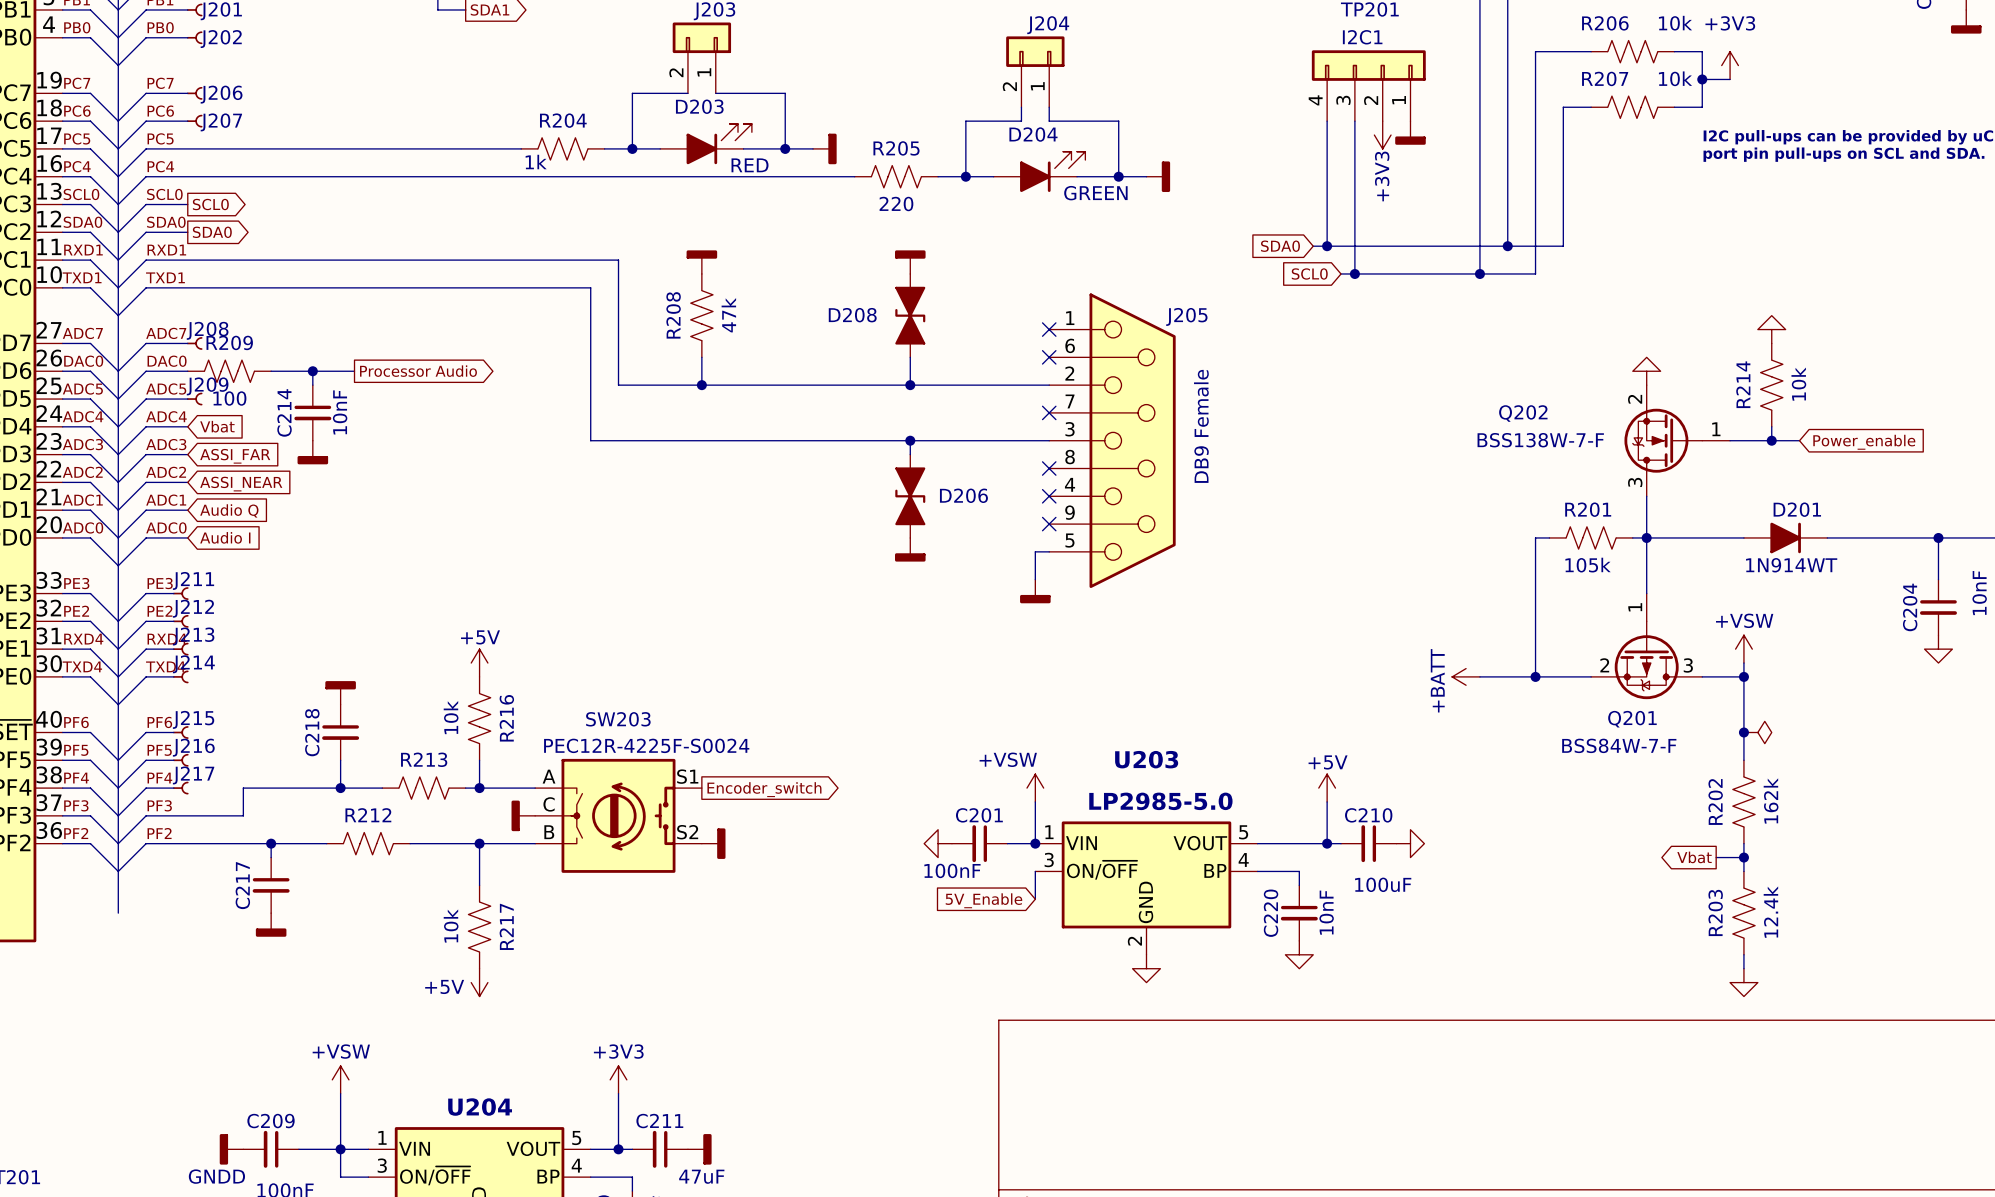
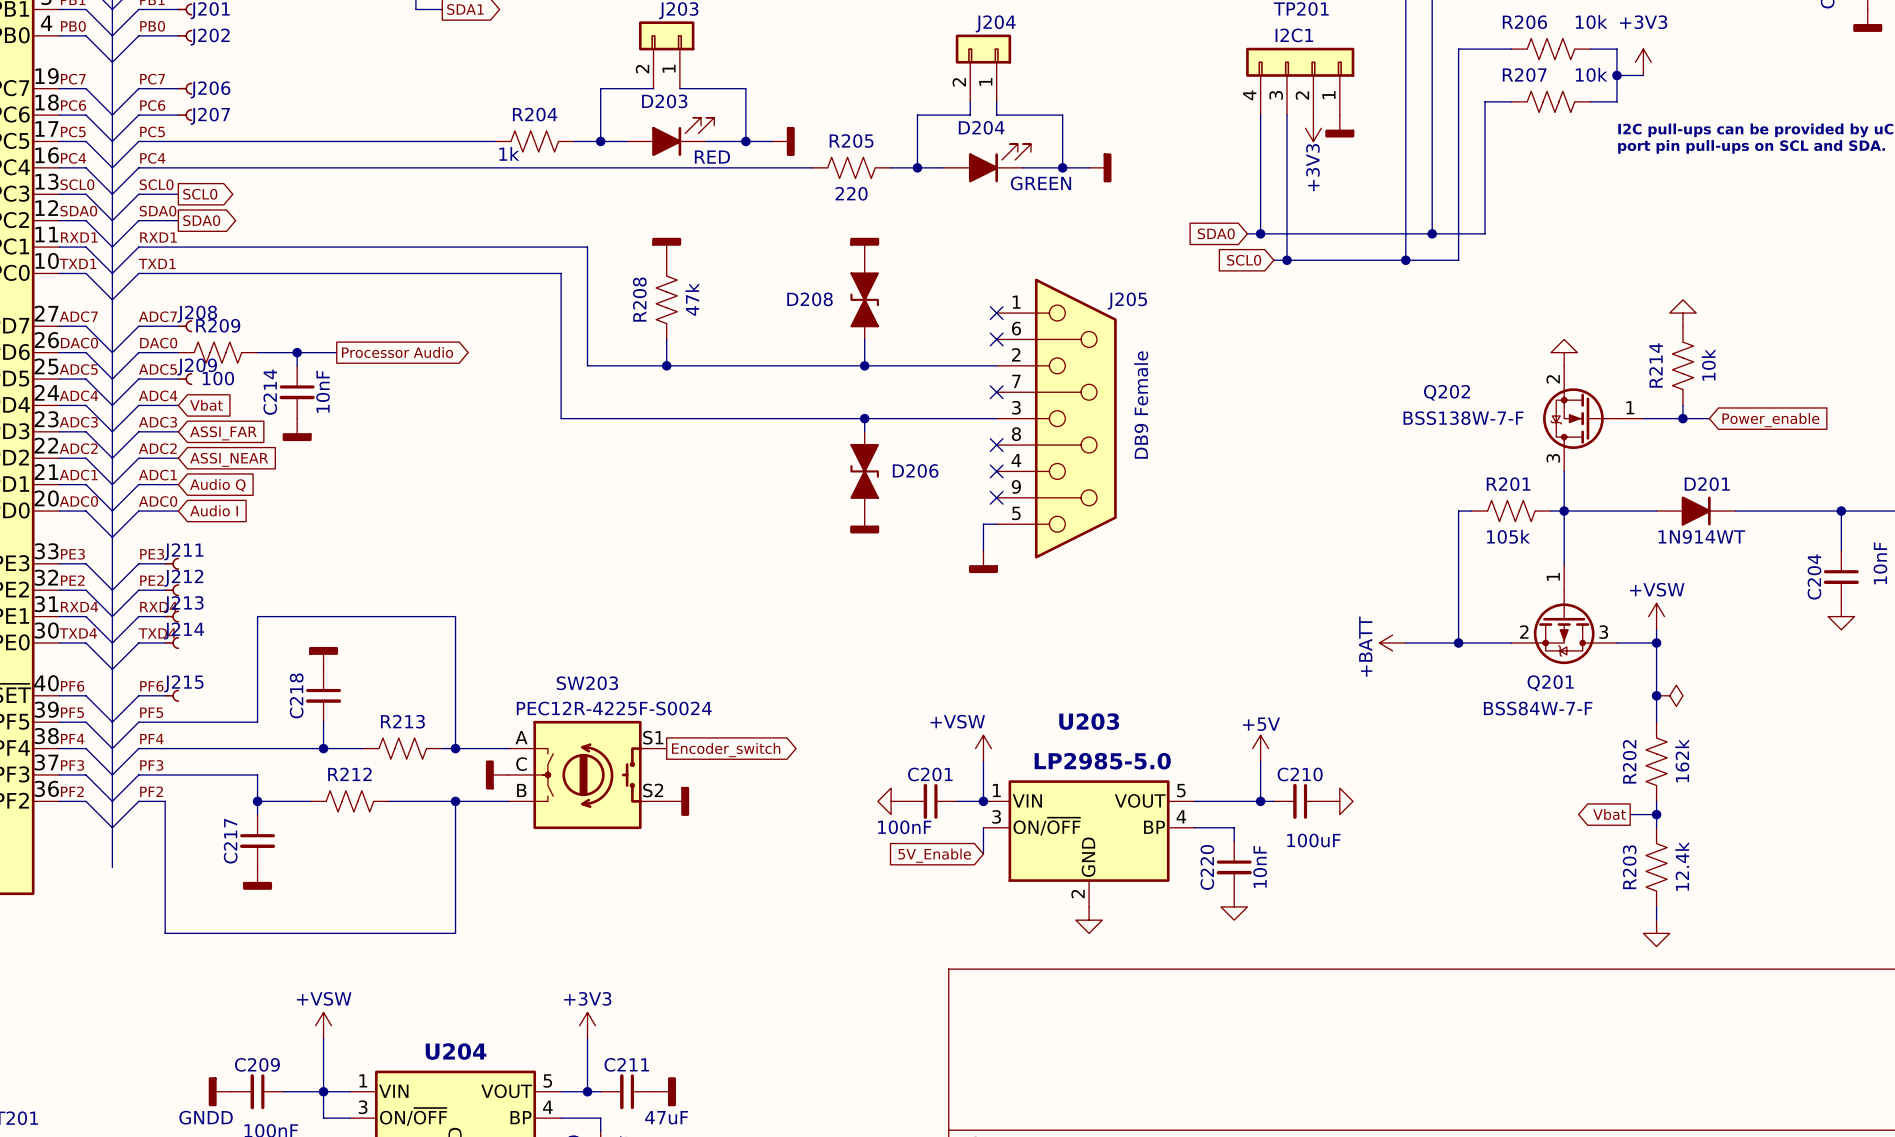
power symbol: +5V (479, 663) -> none
R216: 10k (479, 718) -> none
wire: none -> (165, 722) (257, 722) (257, 616) (455, 616) (455, 722)
J216: (180, 760) -> none
wire: none -> (165, 748) (231, 748)
J217: (180, 788) -> none
wire: (243, 788) (243, 815) -> (257, 801) (257, 774) (231, 774)
wire: (173, 843) (271, 843) -> (165, 801) (165, 933) (455, 933) (455, 840)
R217: 10k (479, 927) -> none
power symbol: +5V (479, 982) -> none

